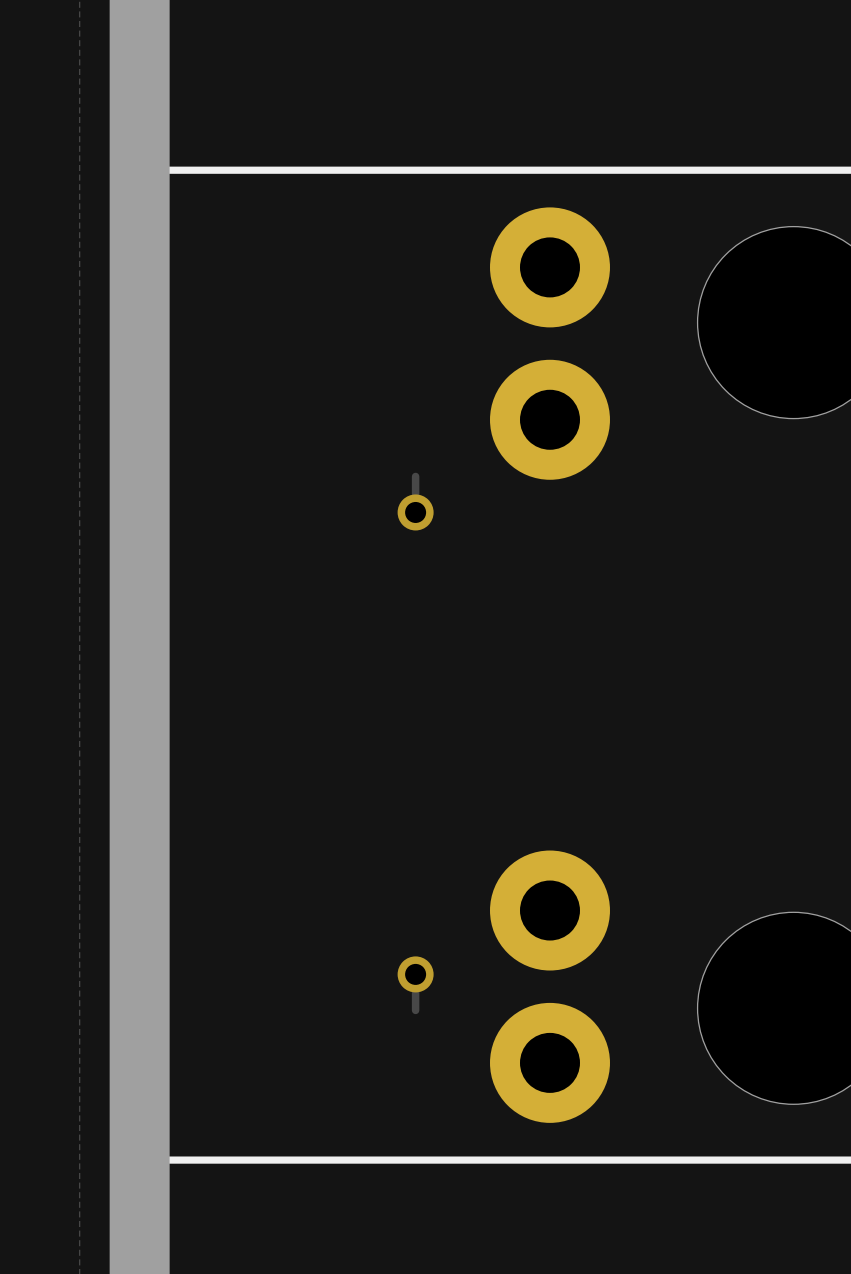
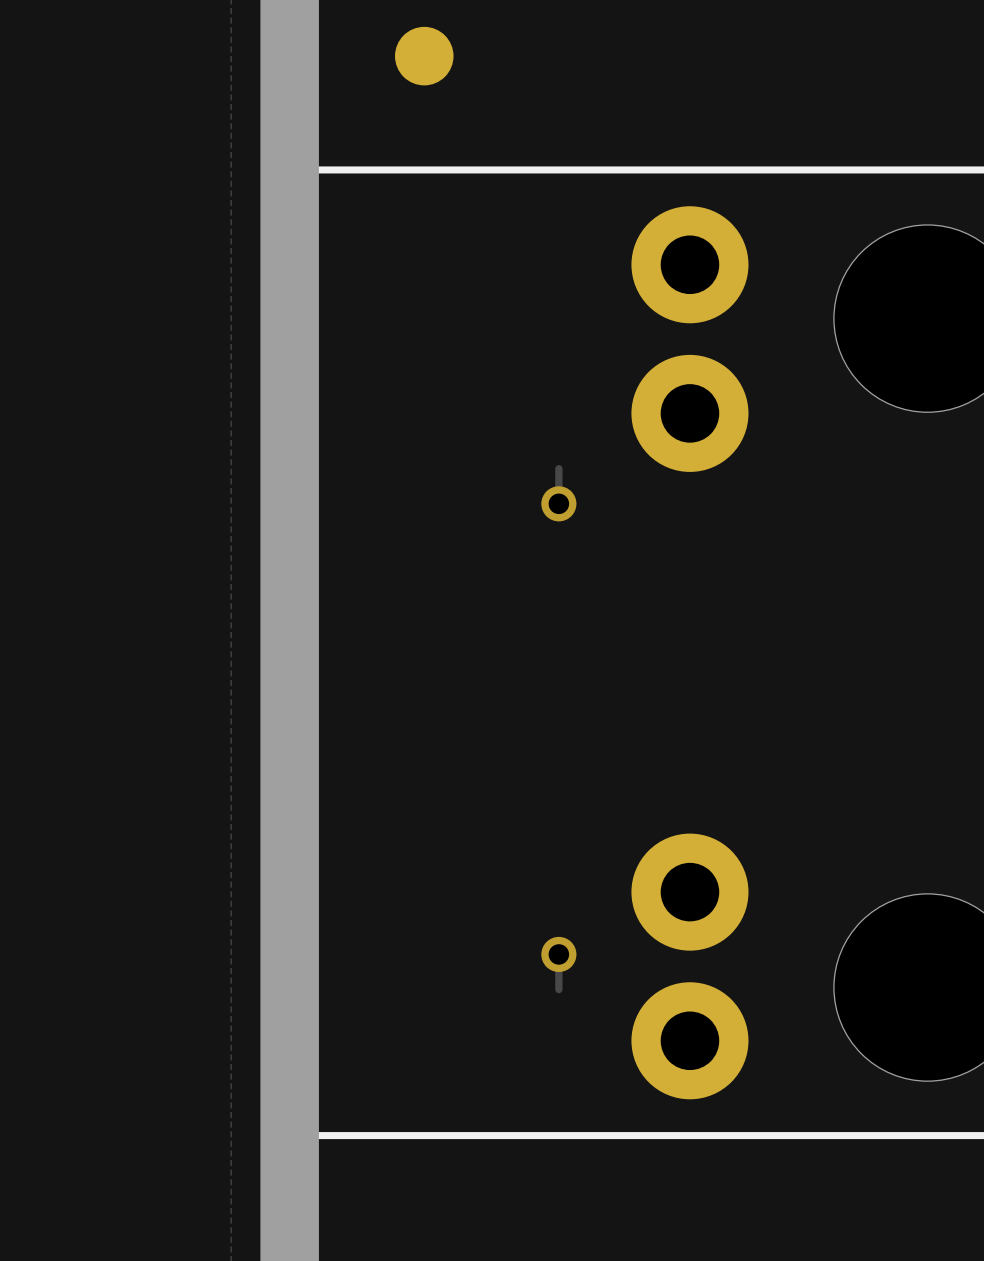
part: none -> (424, 56)

